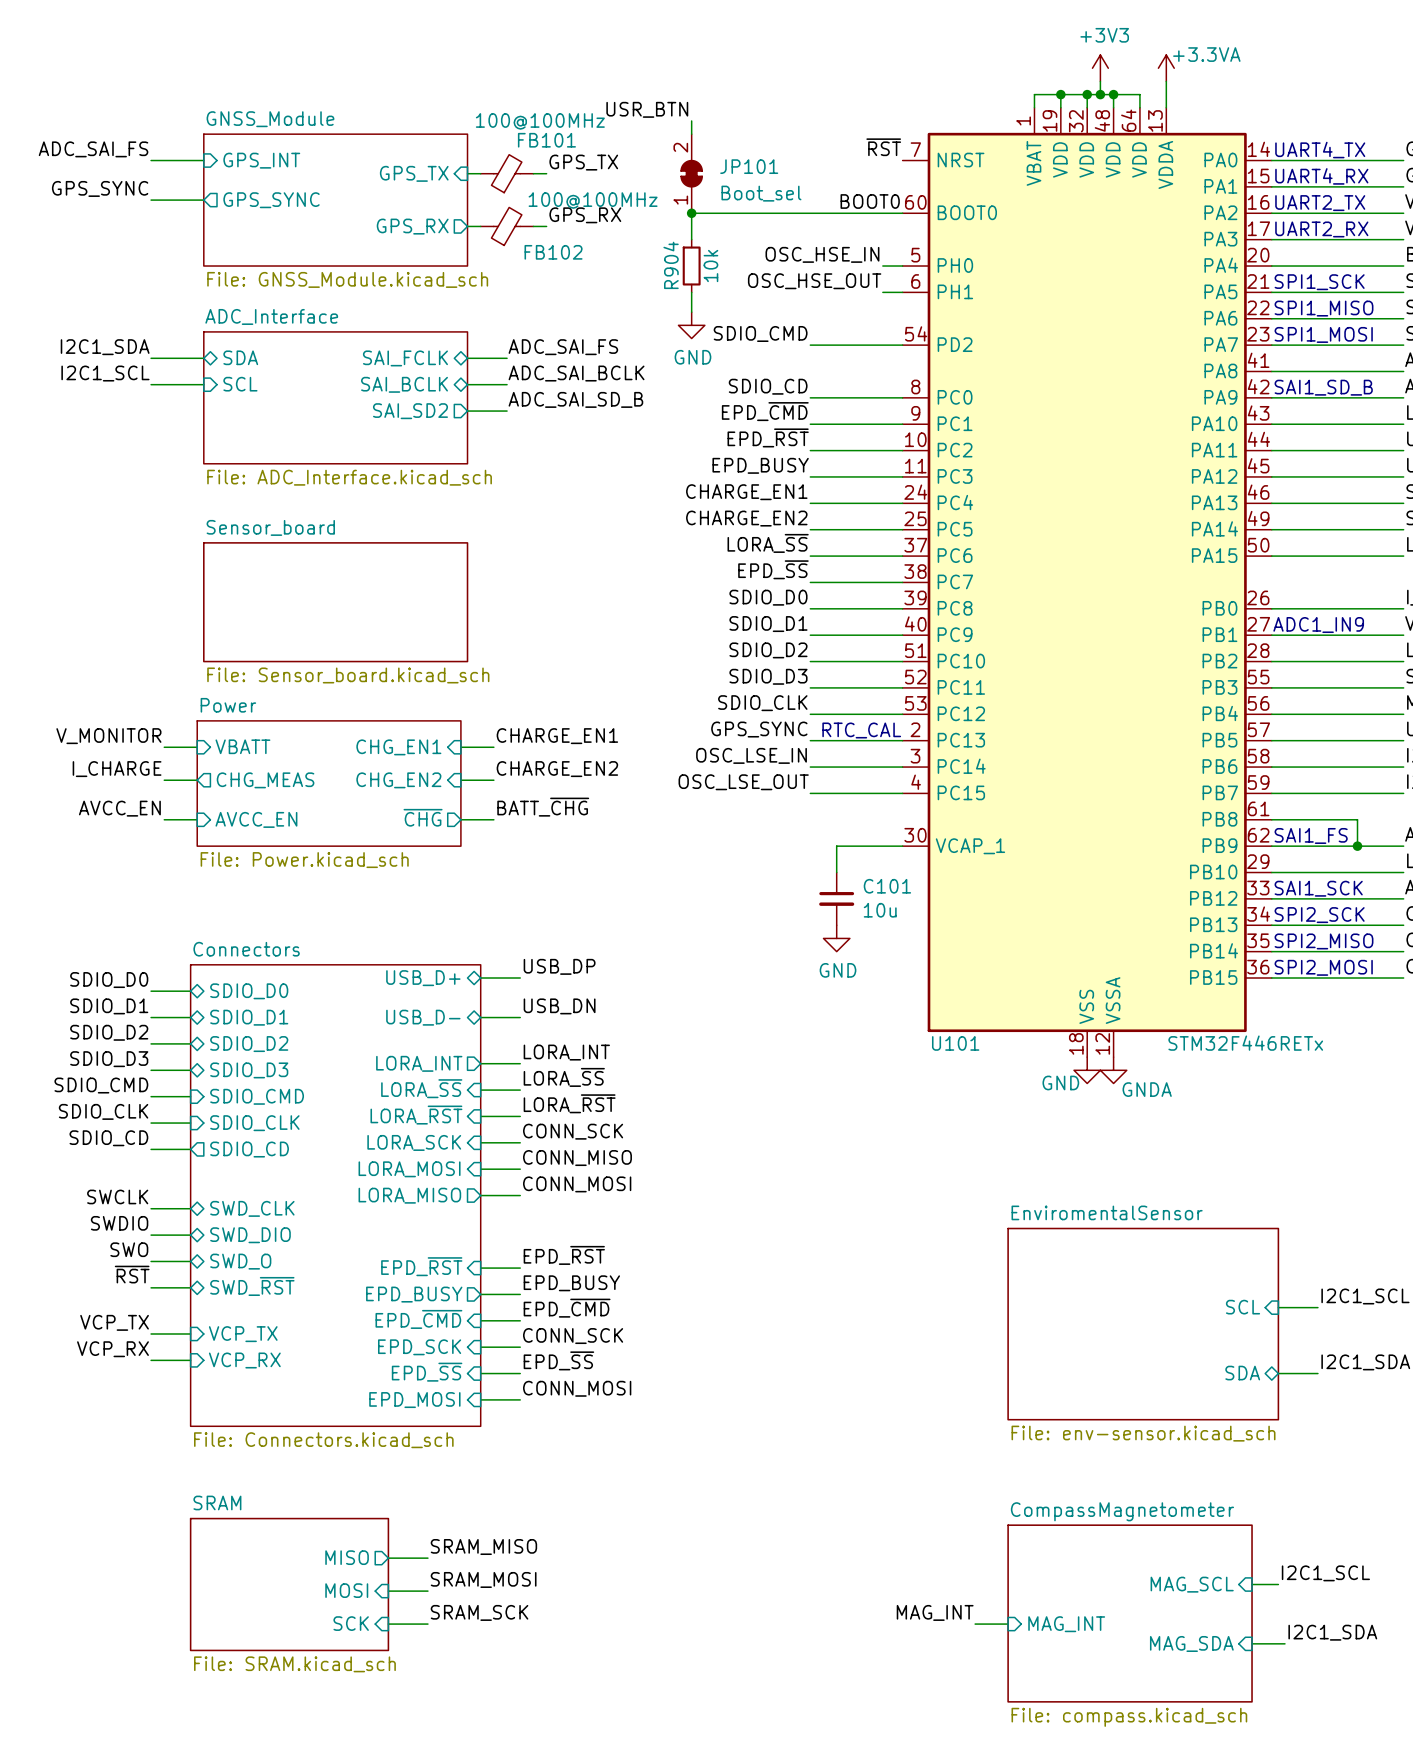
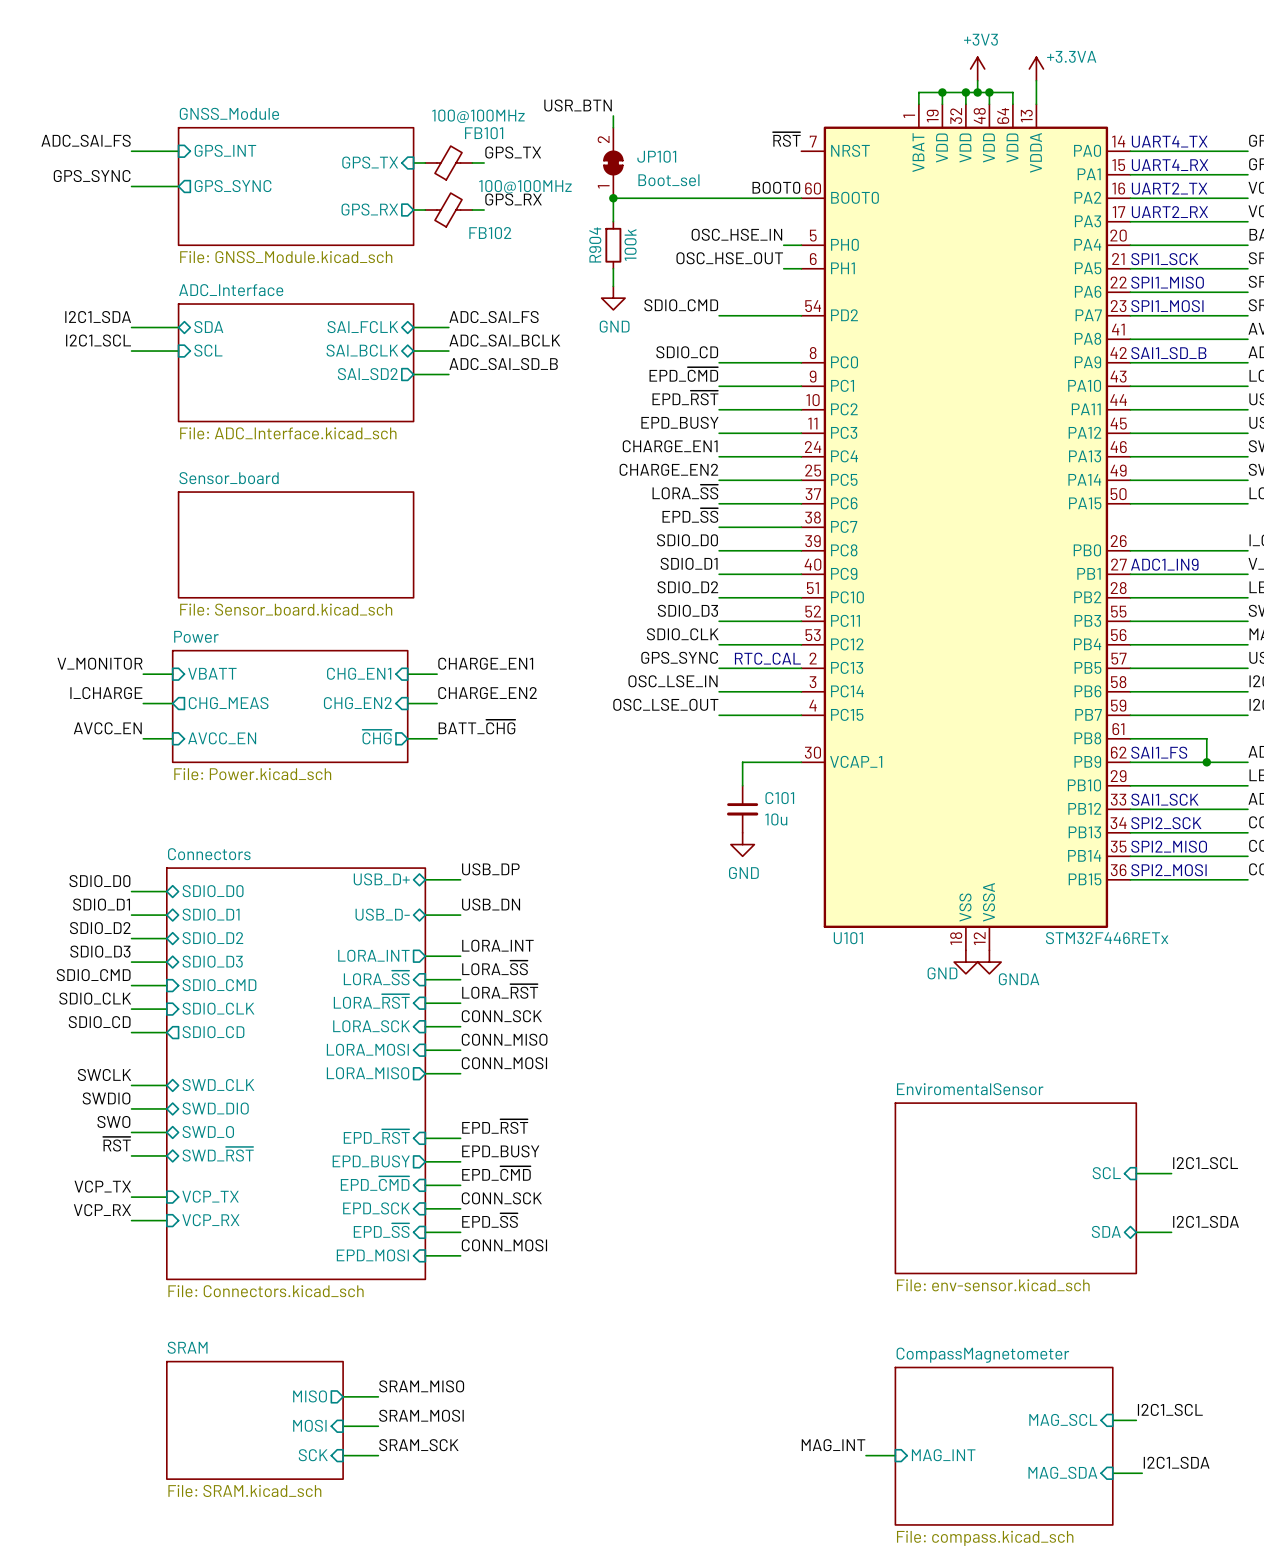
R904 value: 10k (710, 266) -> 100k (630, 245)

